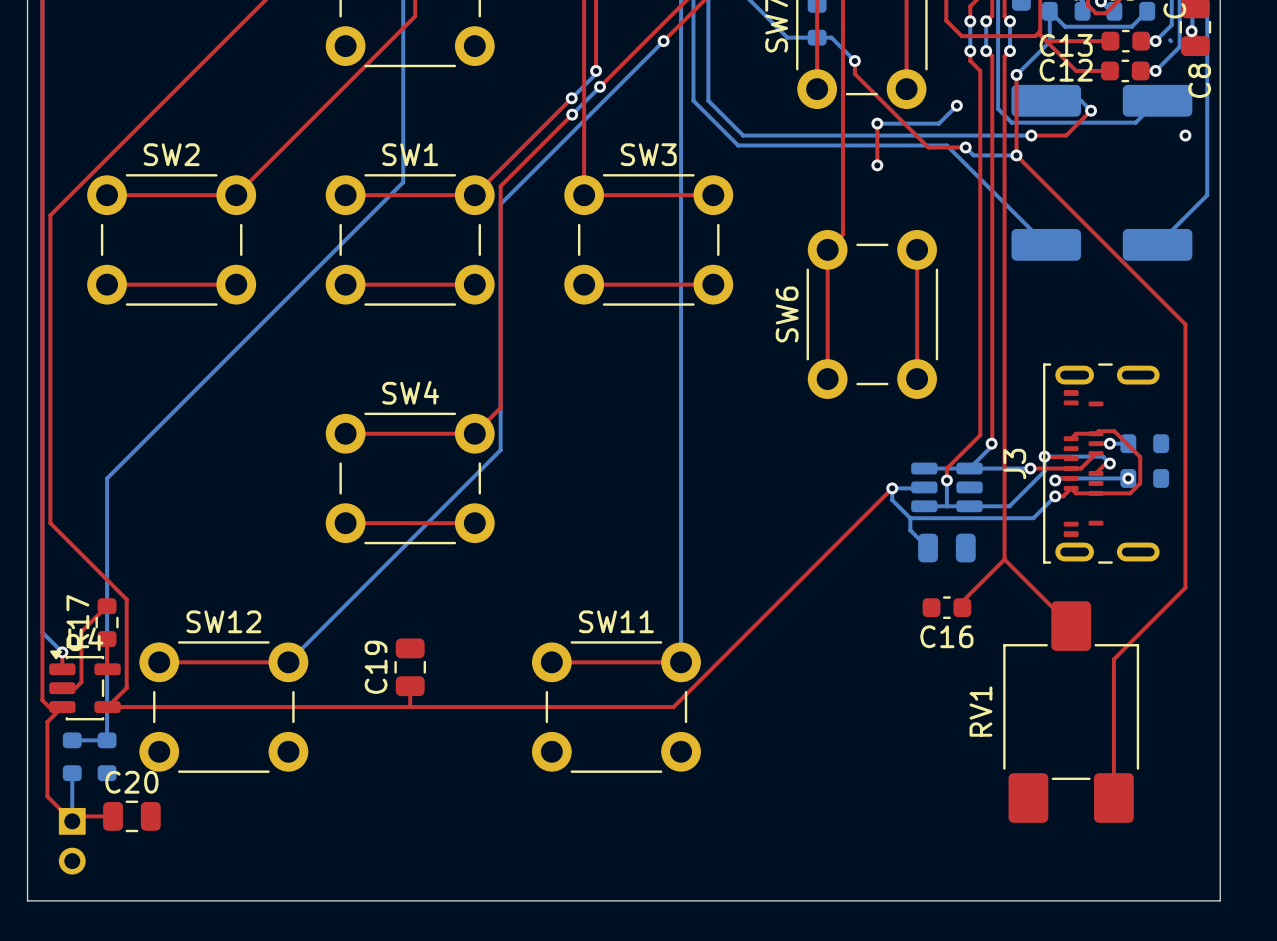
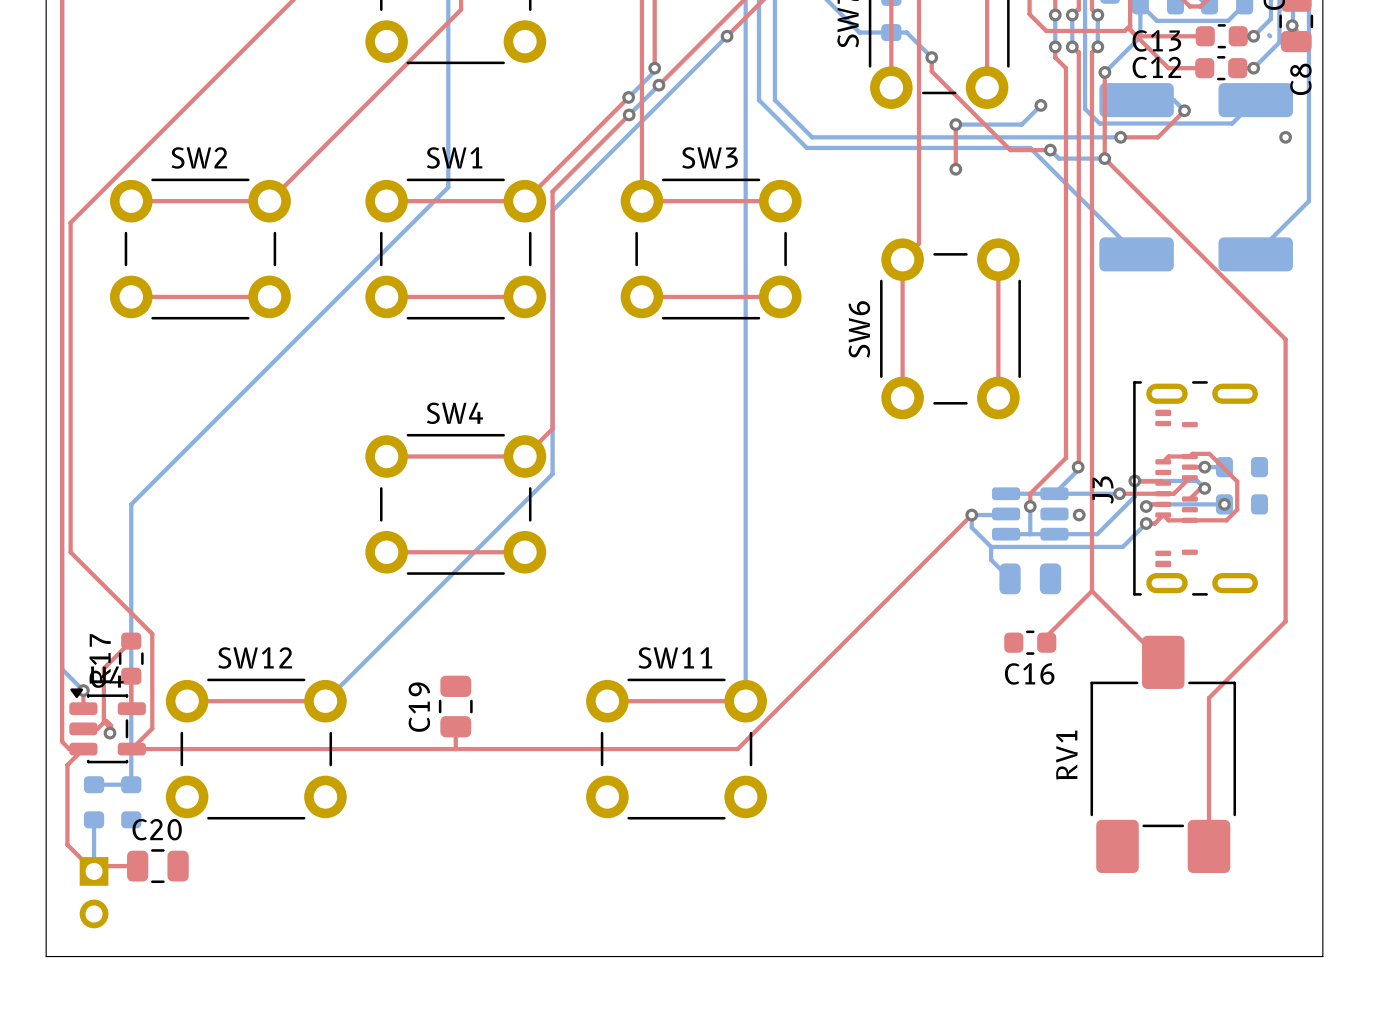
via: none -> (1079, 515)
top track: none -> (105, 721) (110, 725) (110, 733)
via: none -> (110, 733)

